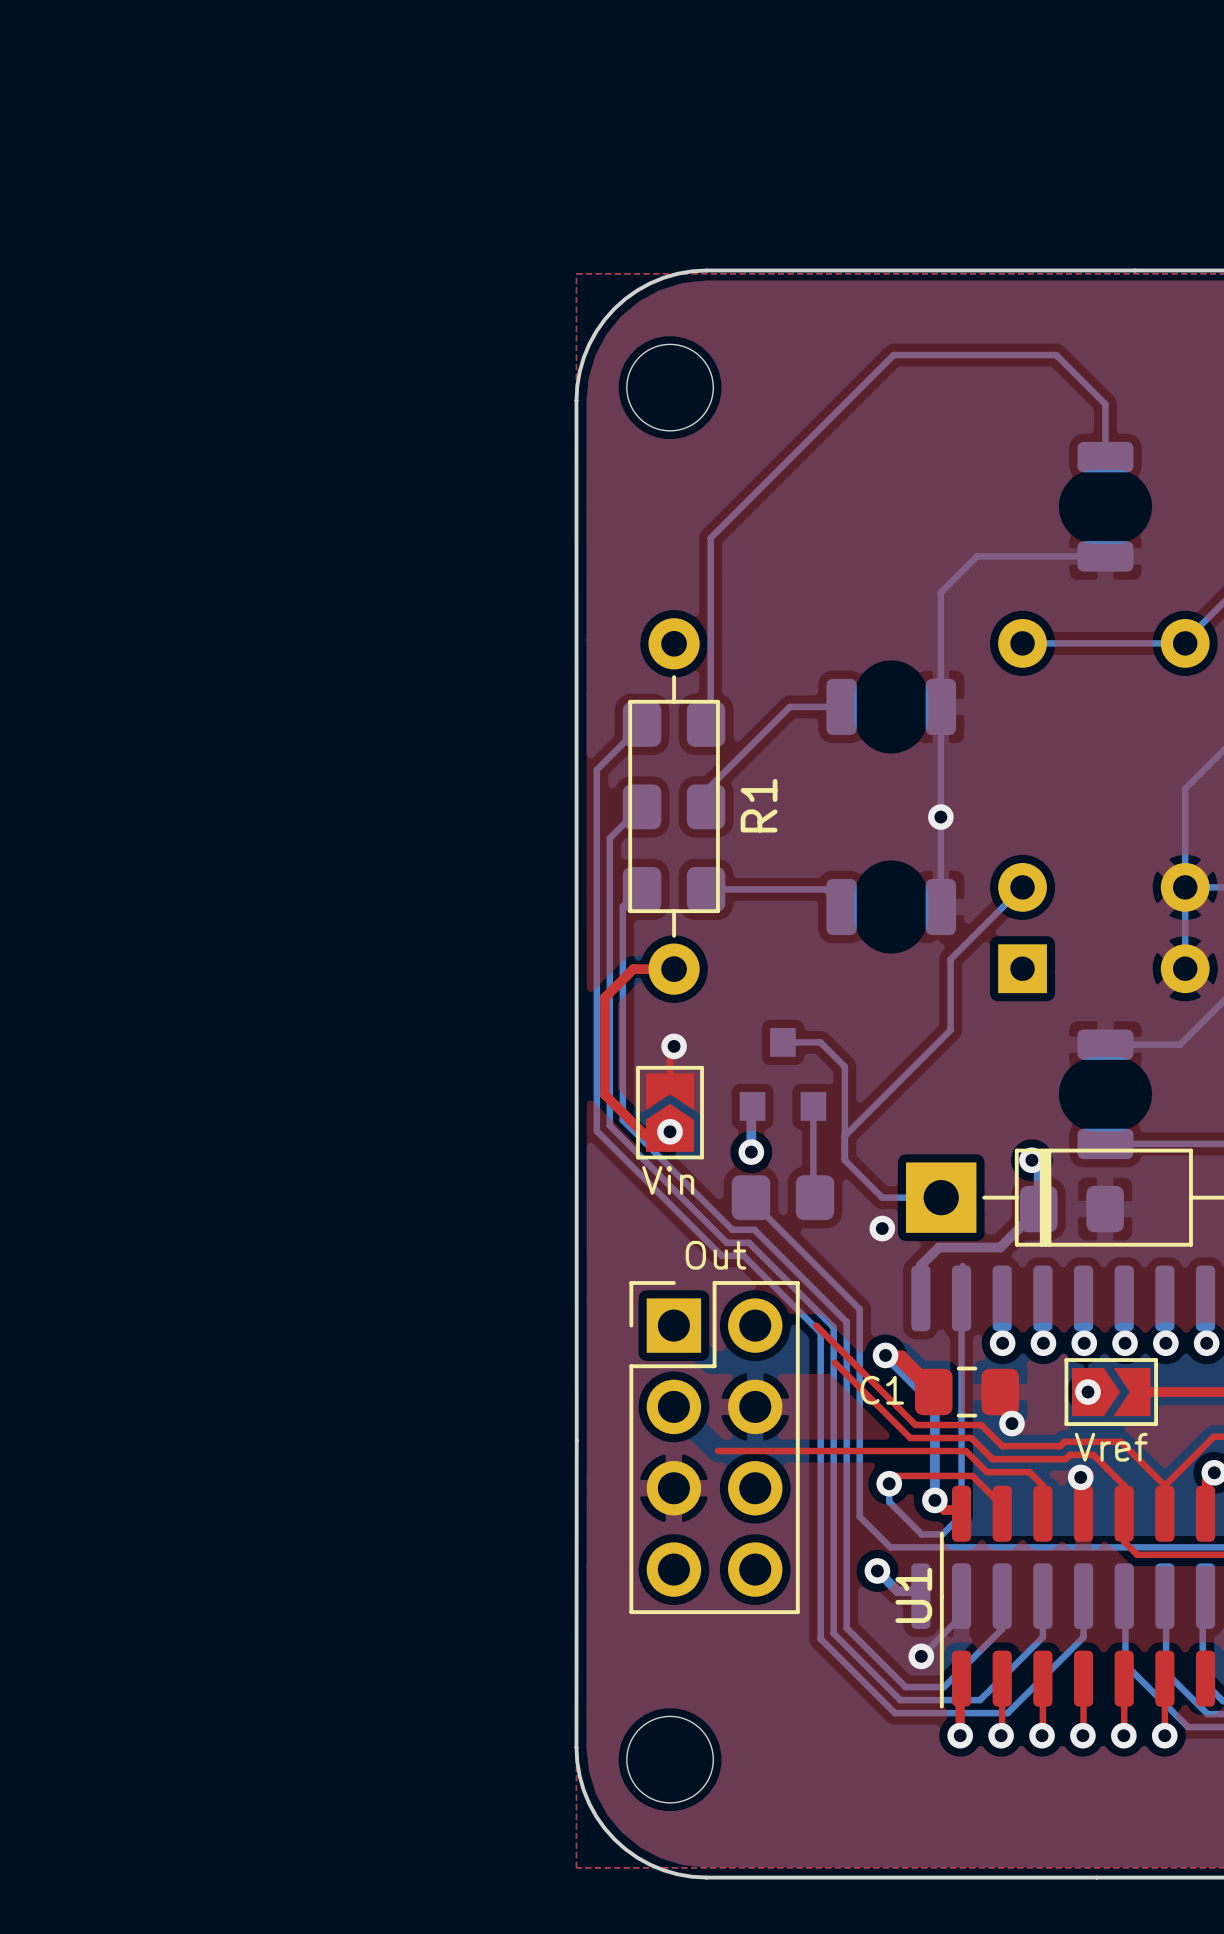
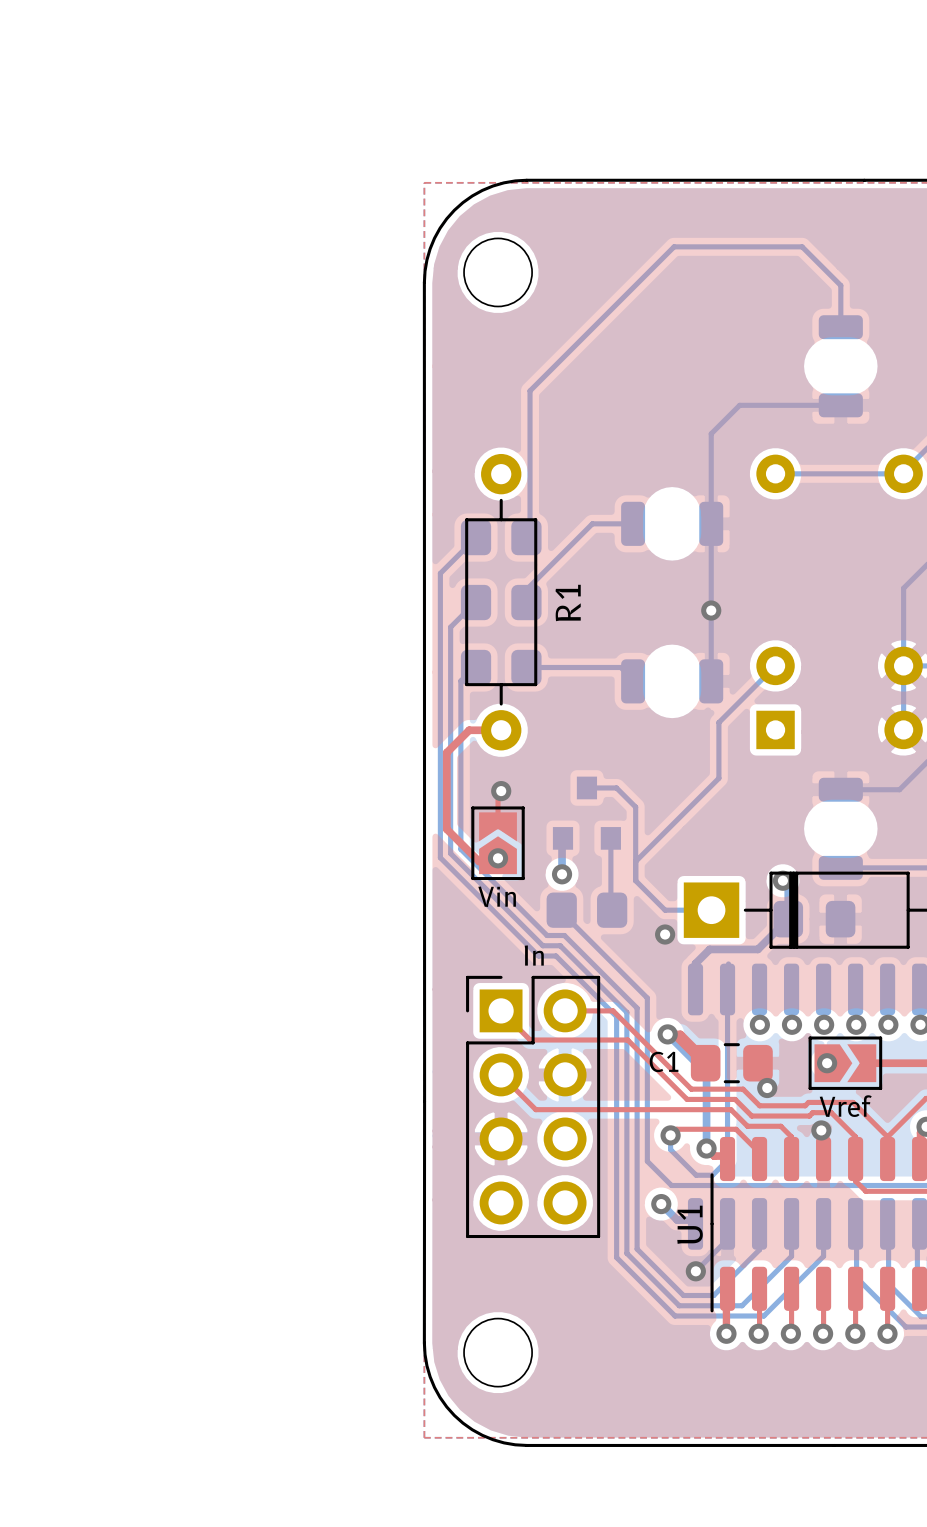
text: Out (715, 1255) -> In (534, 955)
top track: none -> (501, 1010) (530, 1040) (627, 1040)
top track: none -> (565, 1010) (613, 1010)
top track: none -> (501, 1074) (535, 1109)

